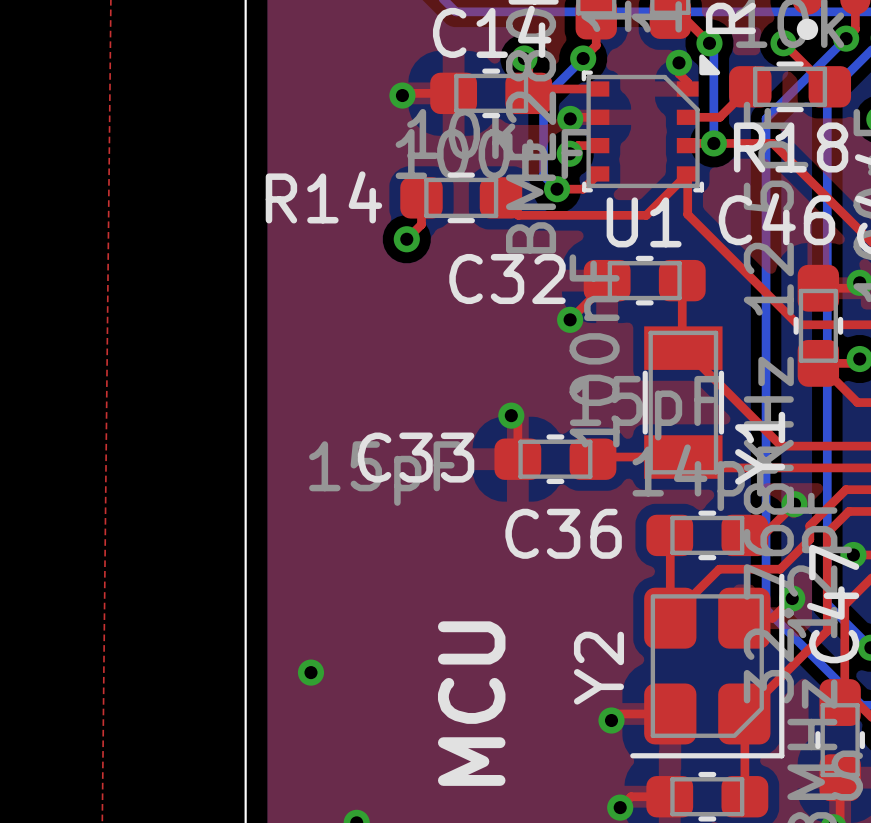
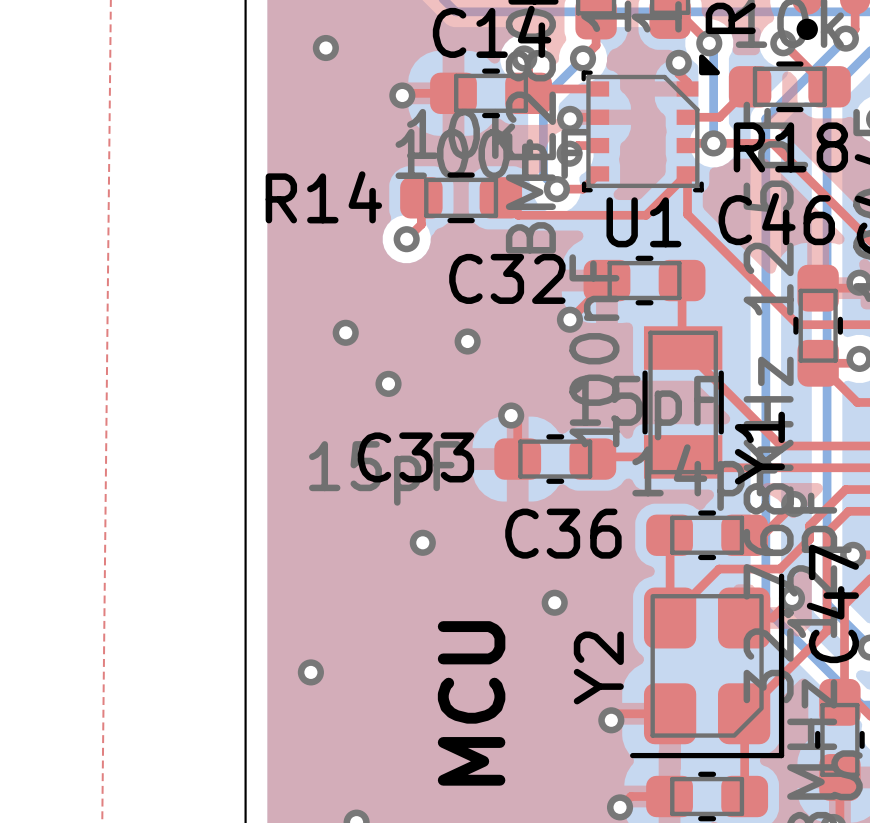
via: none -> (325, 48)
via: none -> (345, 332)
via: none -> (467, 341)
via: none -> (388, 383)
via: none -> (422, 542)
via: none -> (554, 602)

